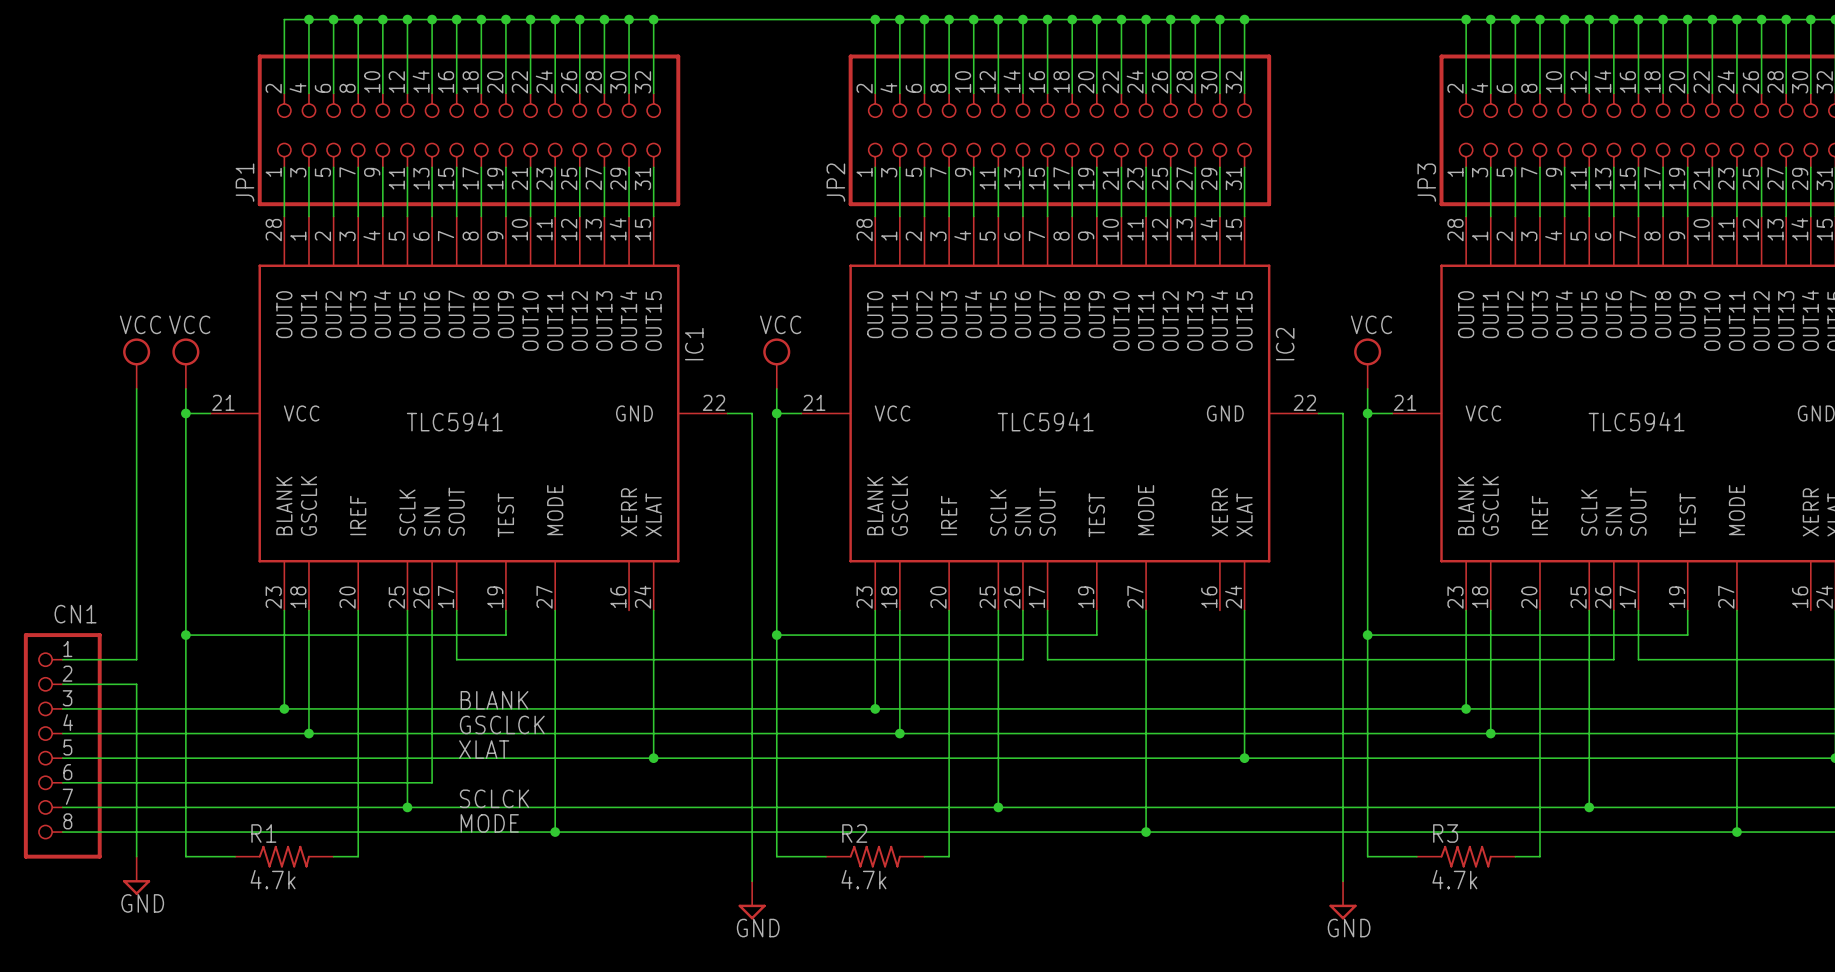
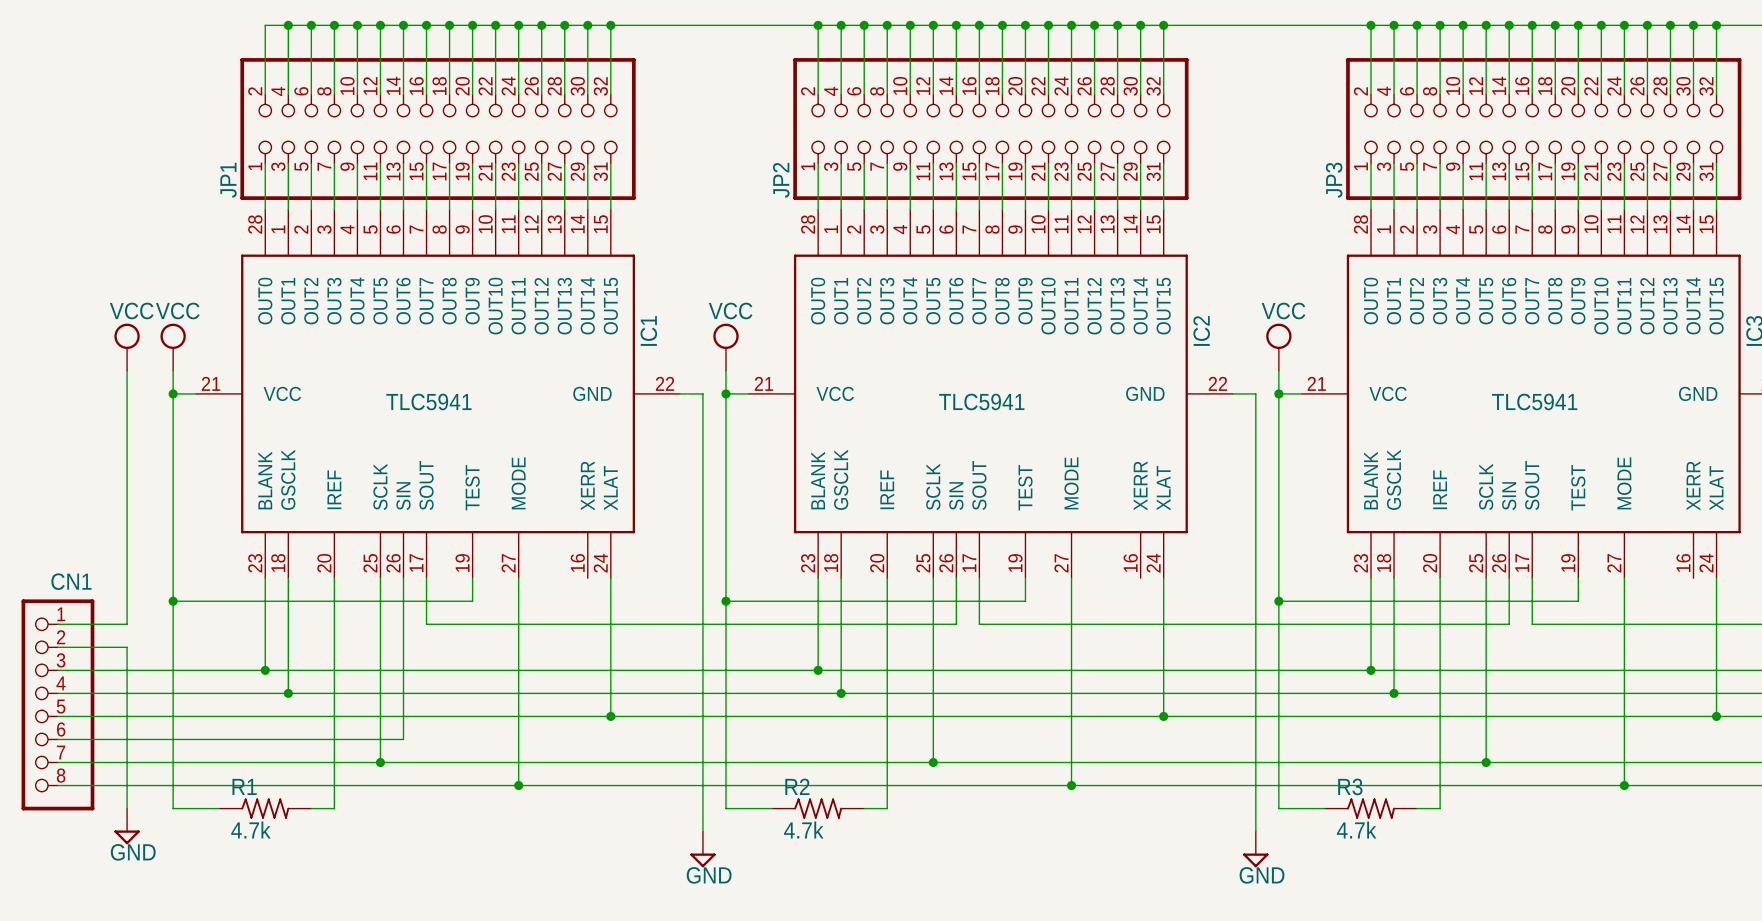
label: BLANK (494, 700) -> none
label: GSCLCK (502, 724) -> none
label: XLAT (484, 749) -> none
label: SCLCK (494, 798) -> none
label: MODE (489, 823) -> none

